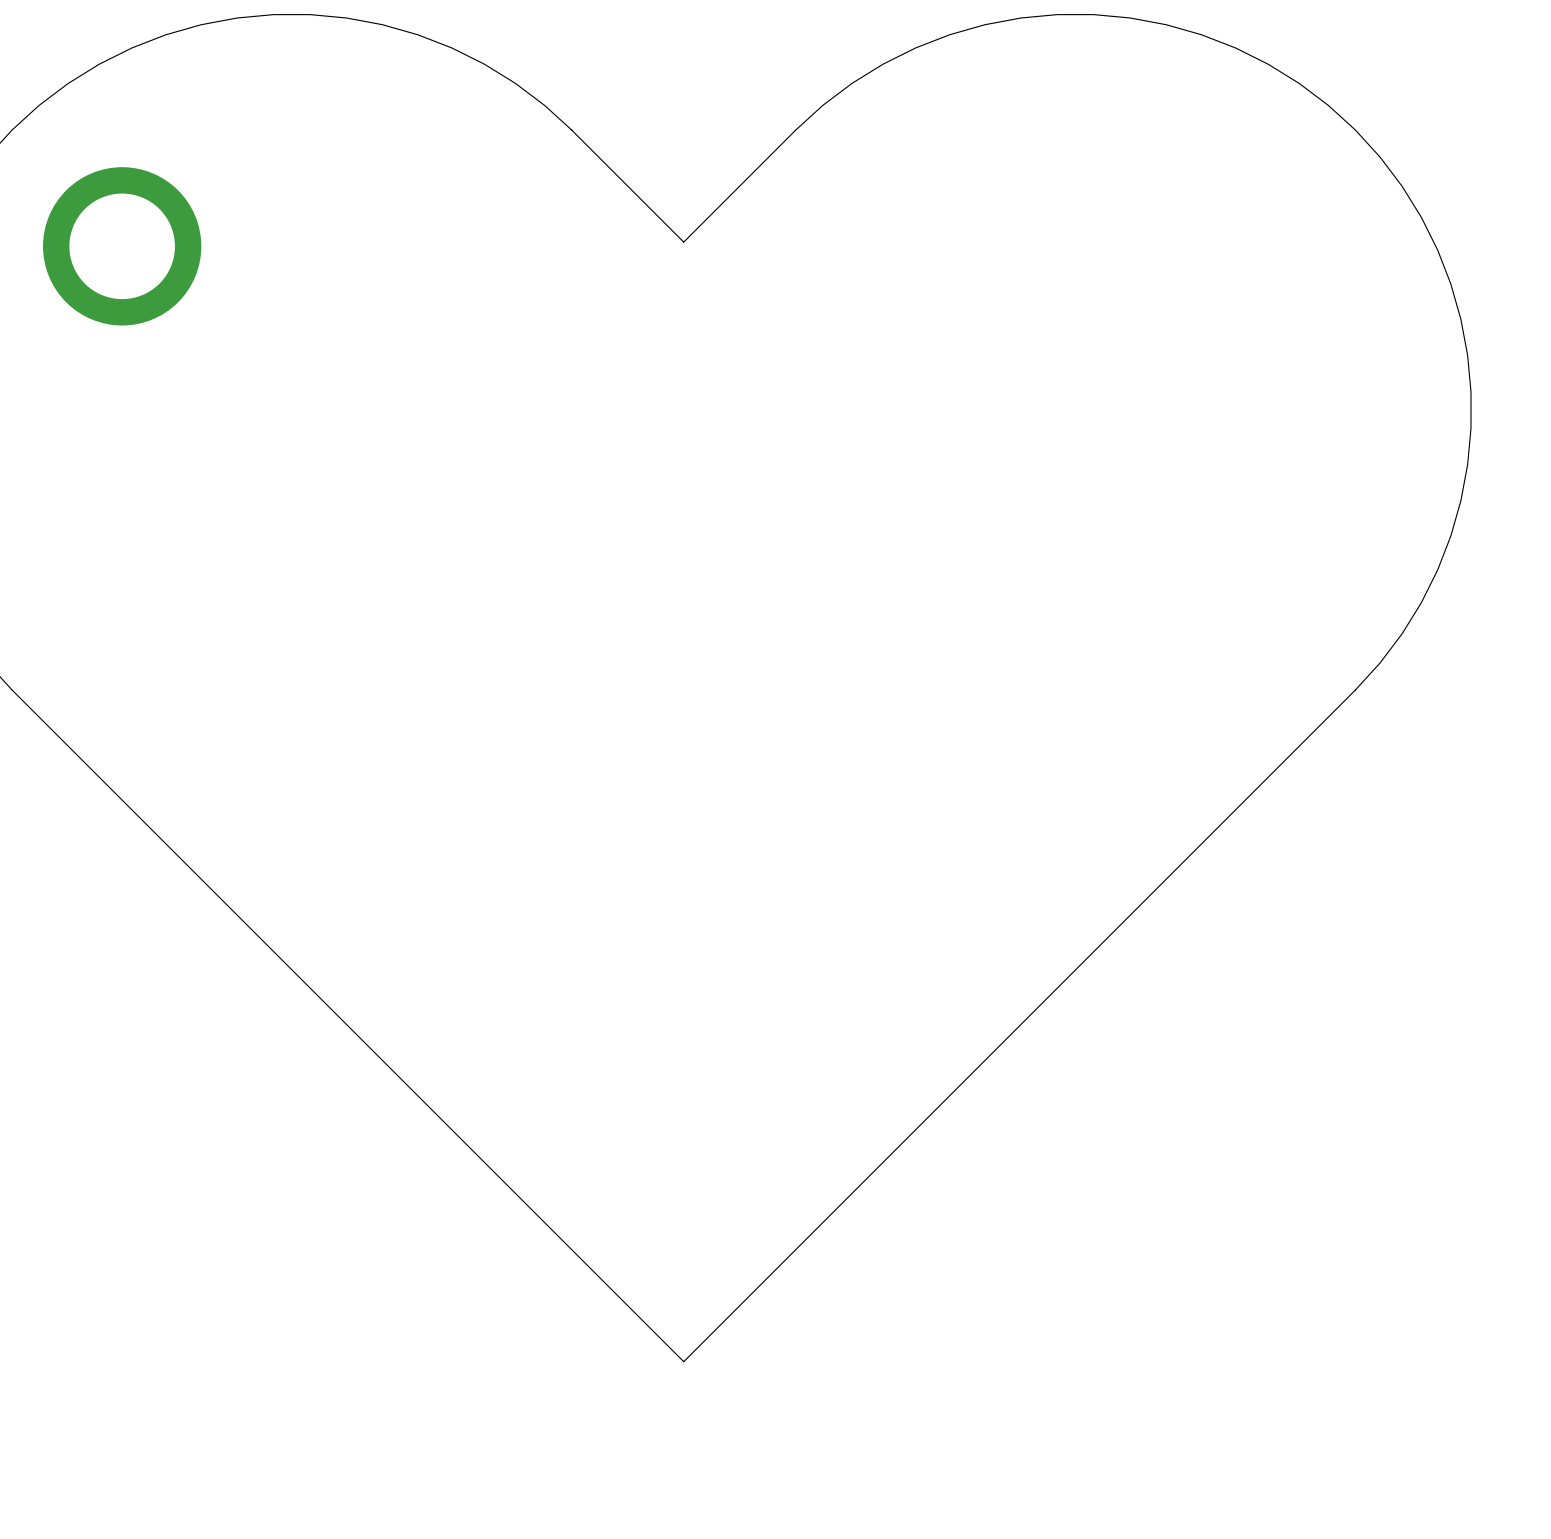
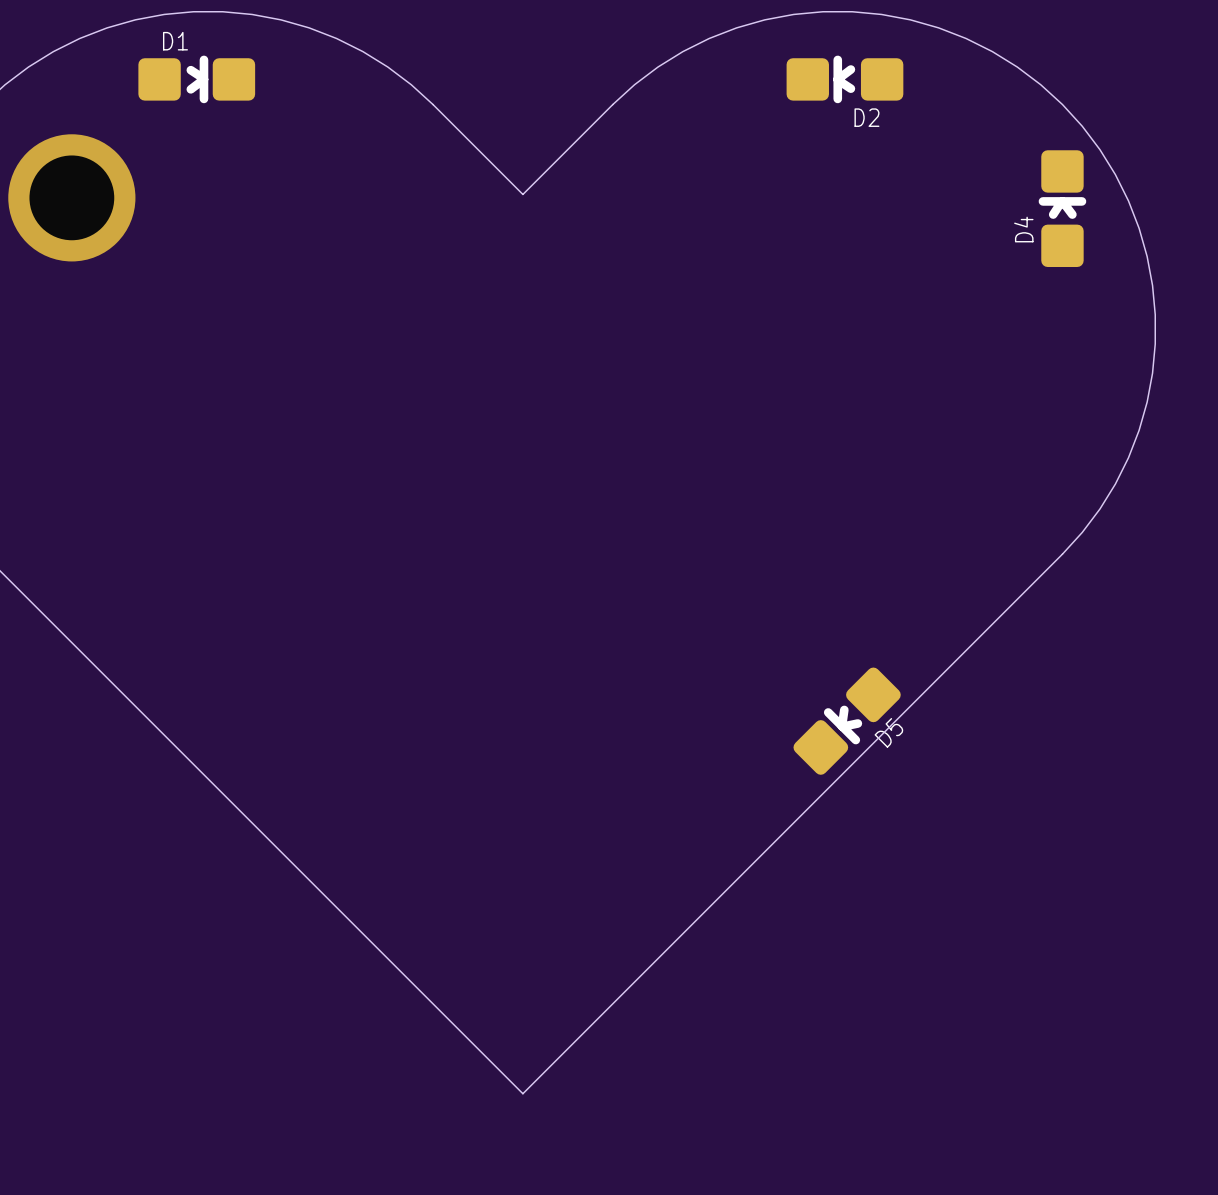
D1: none -> (196, 79)
D2: none -> (844, 79)
D4: none -> (1062, 208)
D5: none -> (847, 721)

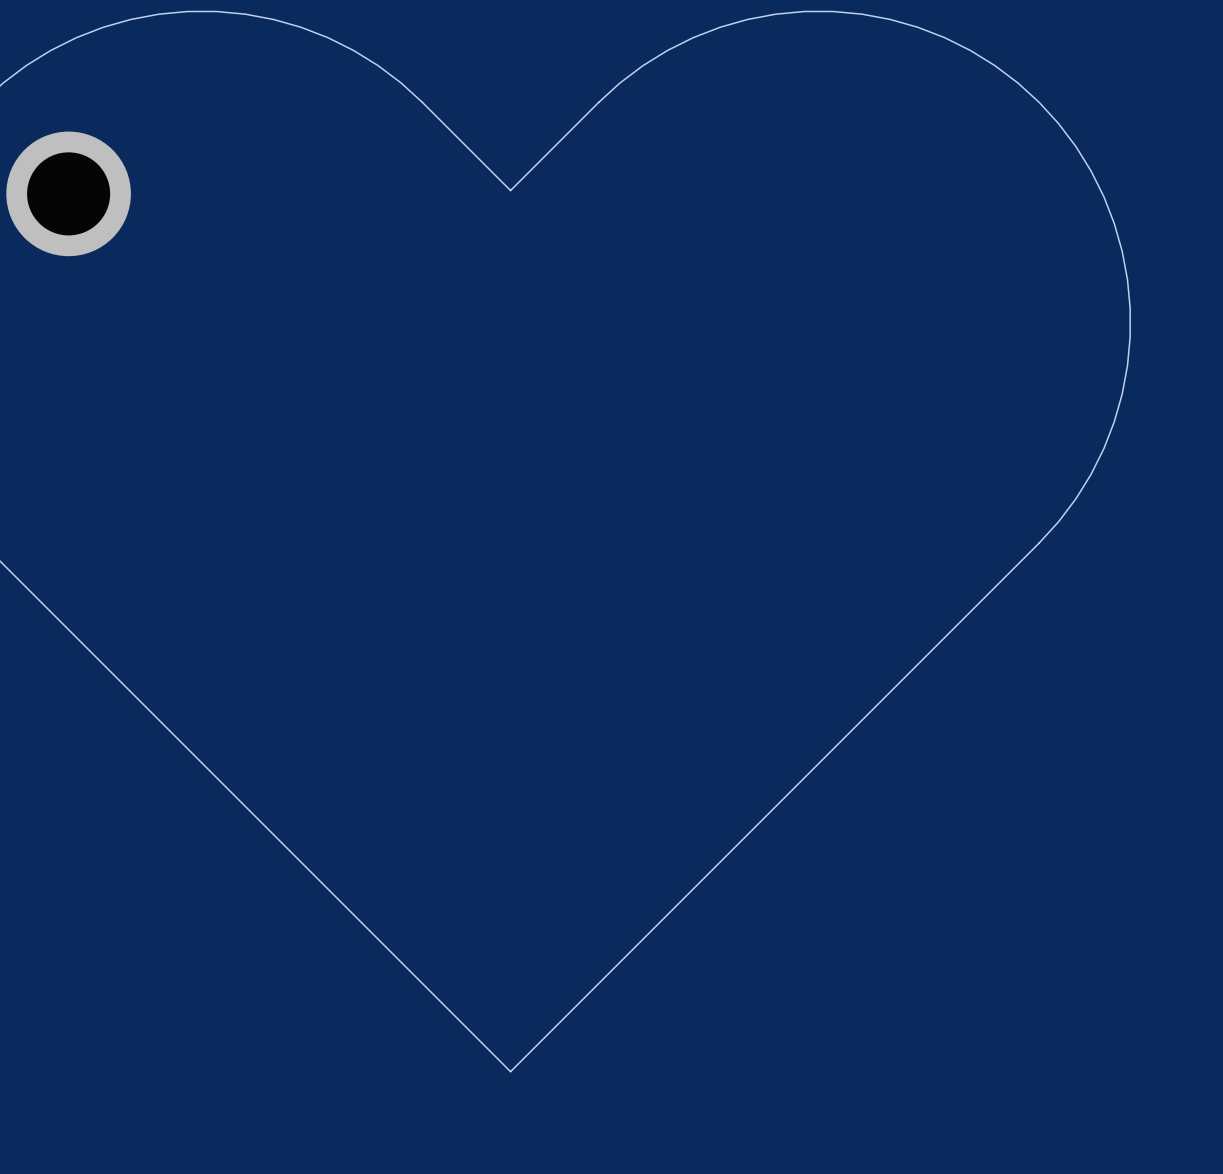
D1: (196, 79) -> none
D2: (844, 79) -> none
D4: (1062, 208) -> none
D5: (847, 721) -> none

